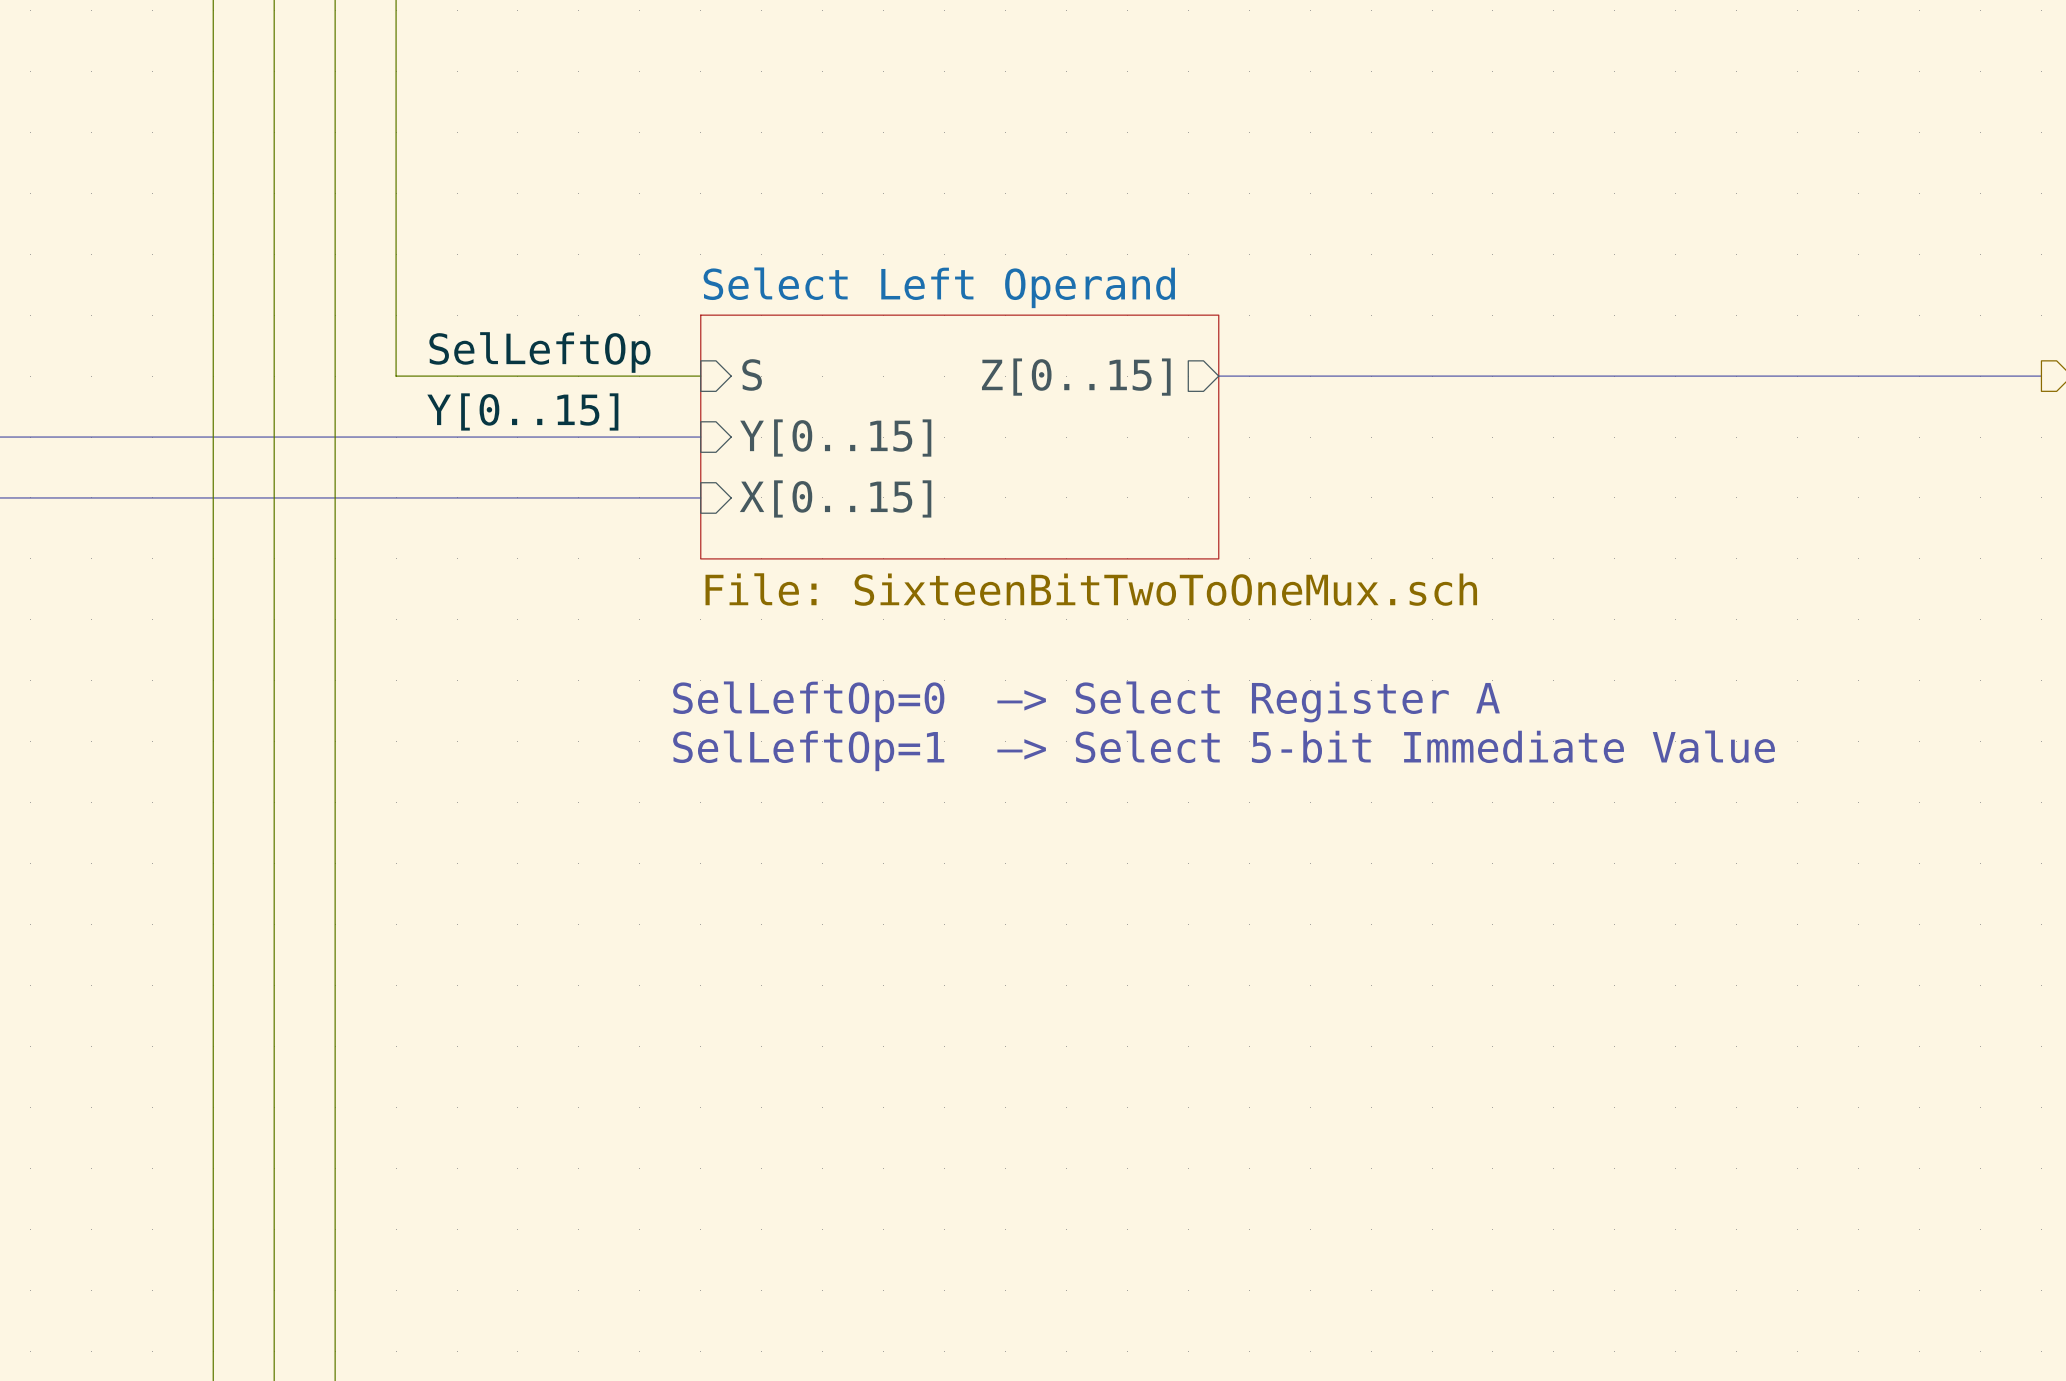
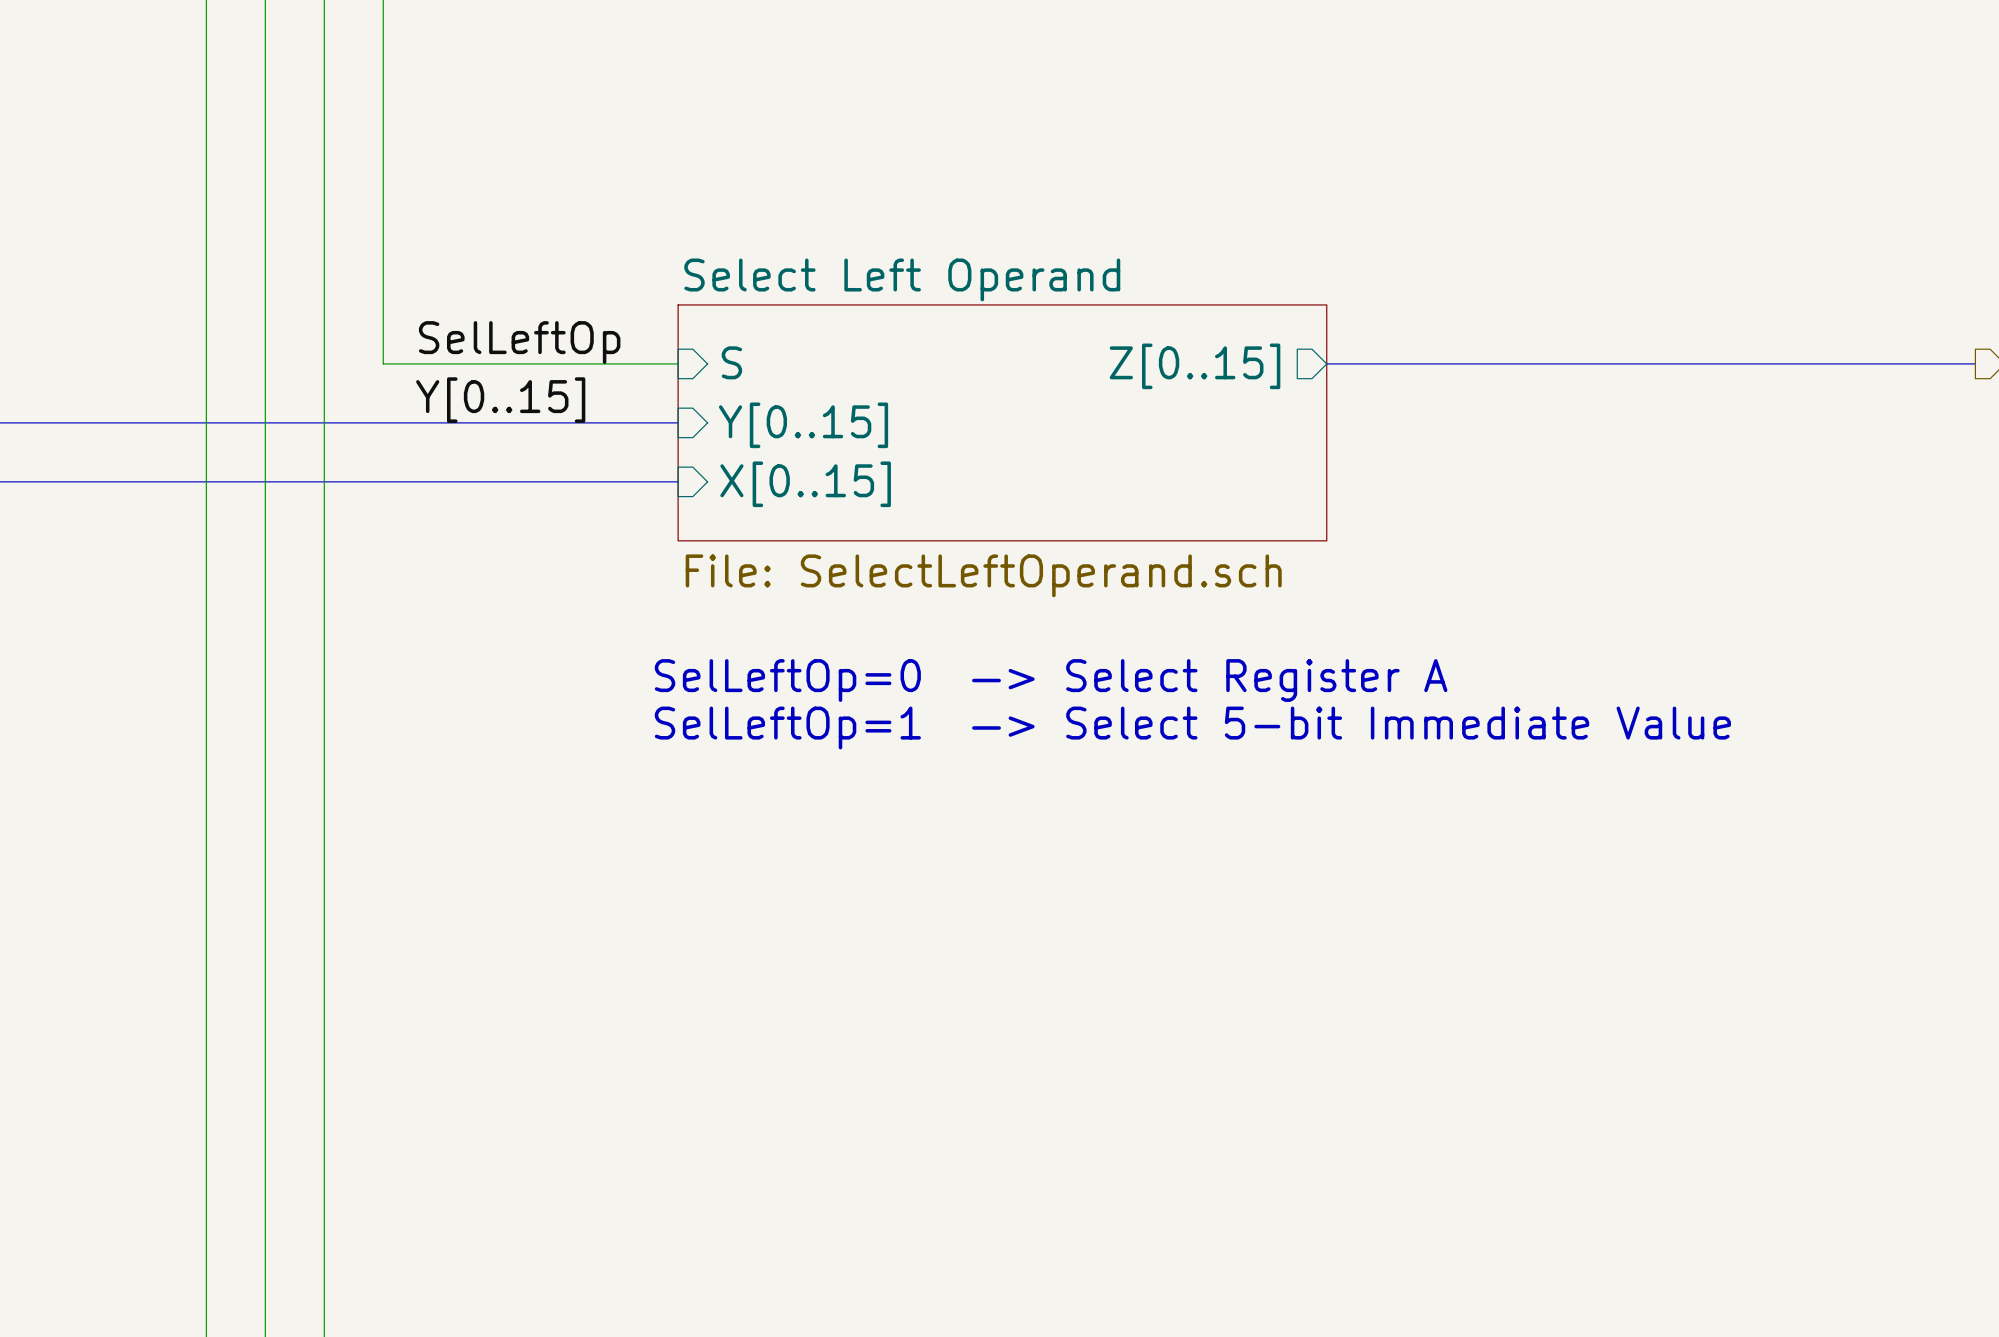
bus: (1218, 376) (1371, 376) -> none
sheet pin position: Z[0..15] (1076, 377) -> Z[0..15] (1195, 366)
sheet Select Left Operand: File: SixteenBitTwoToOneMux.sch (959, 437) -> none
sheet Select Left Operand: none -> File: SelectLeftOperand.sch (1002, 422)

